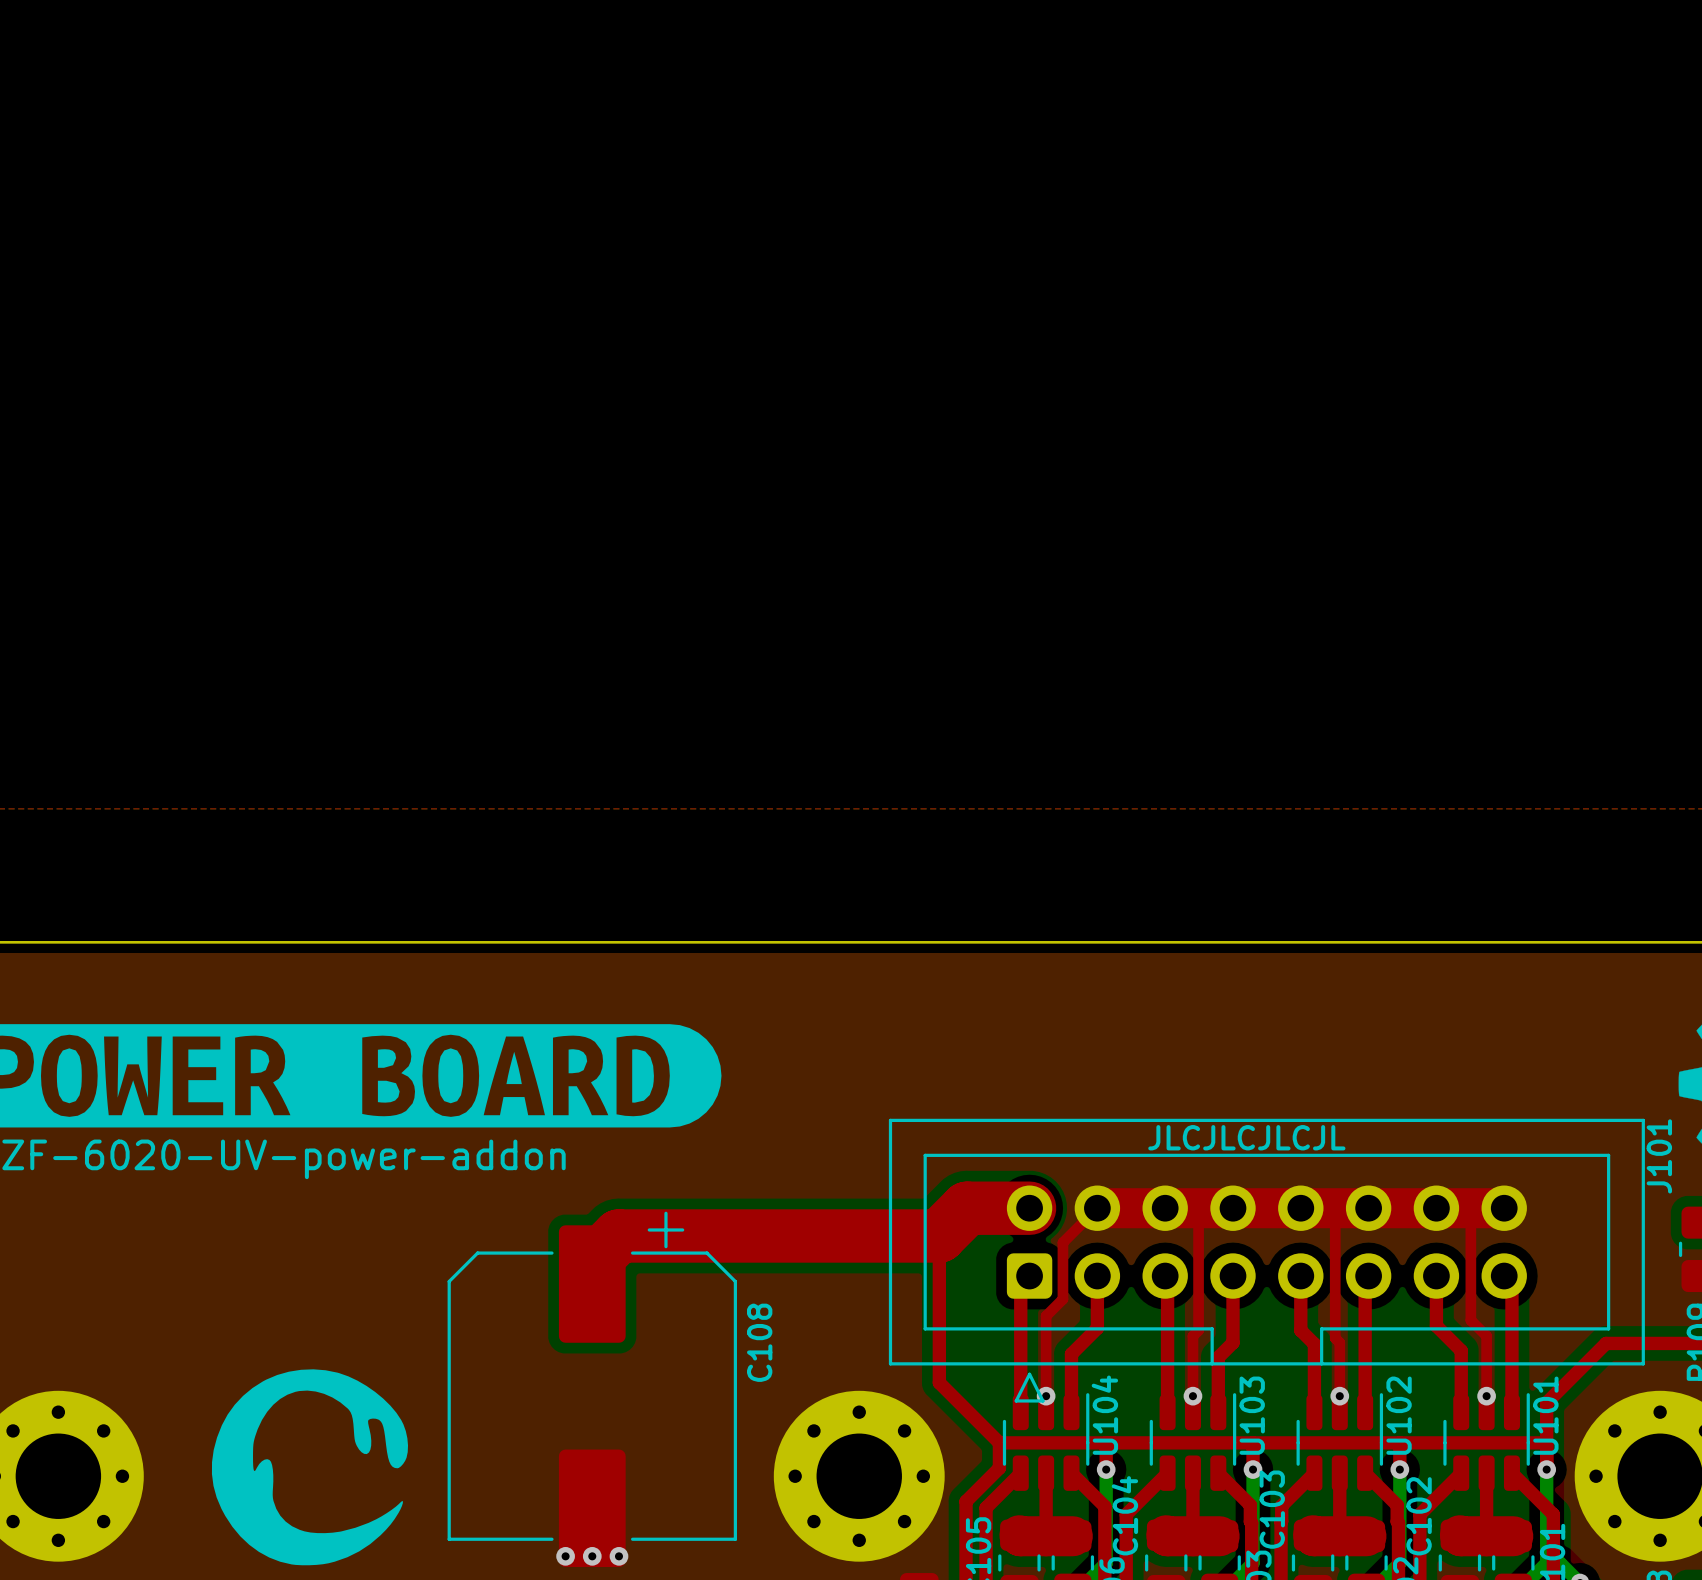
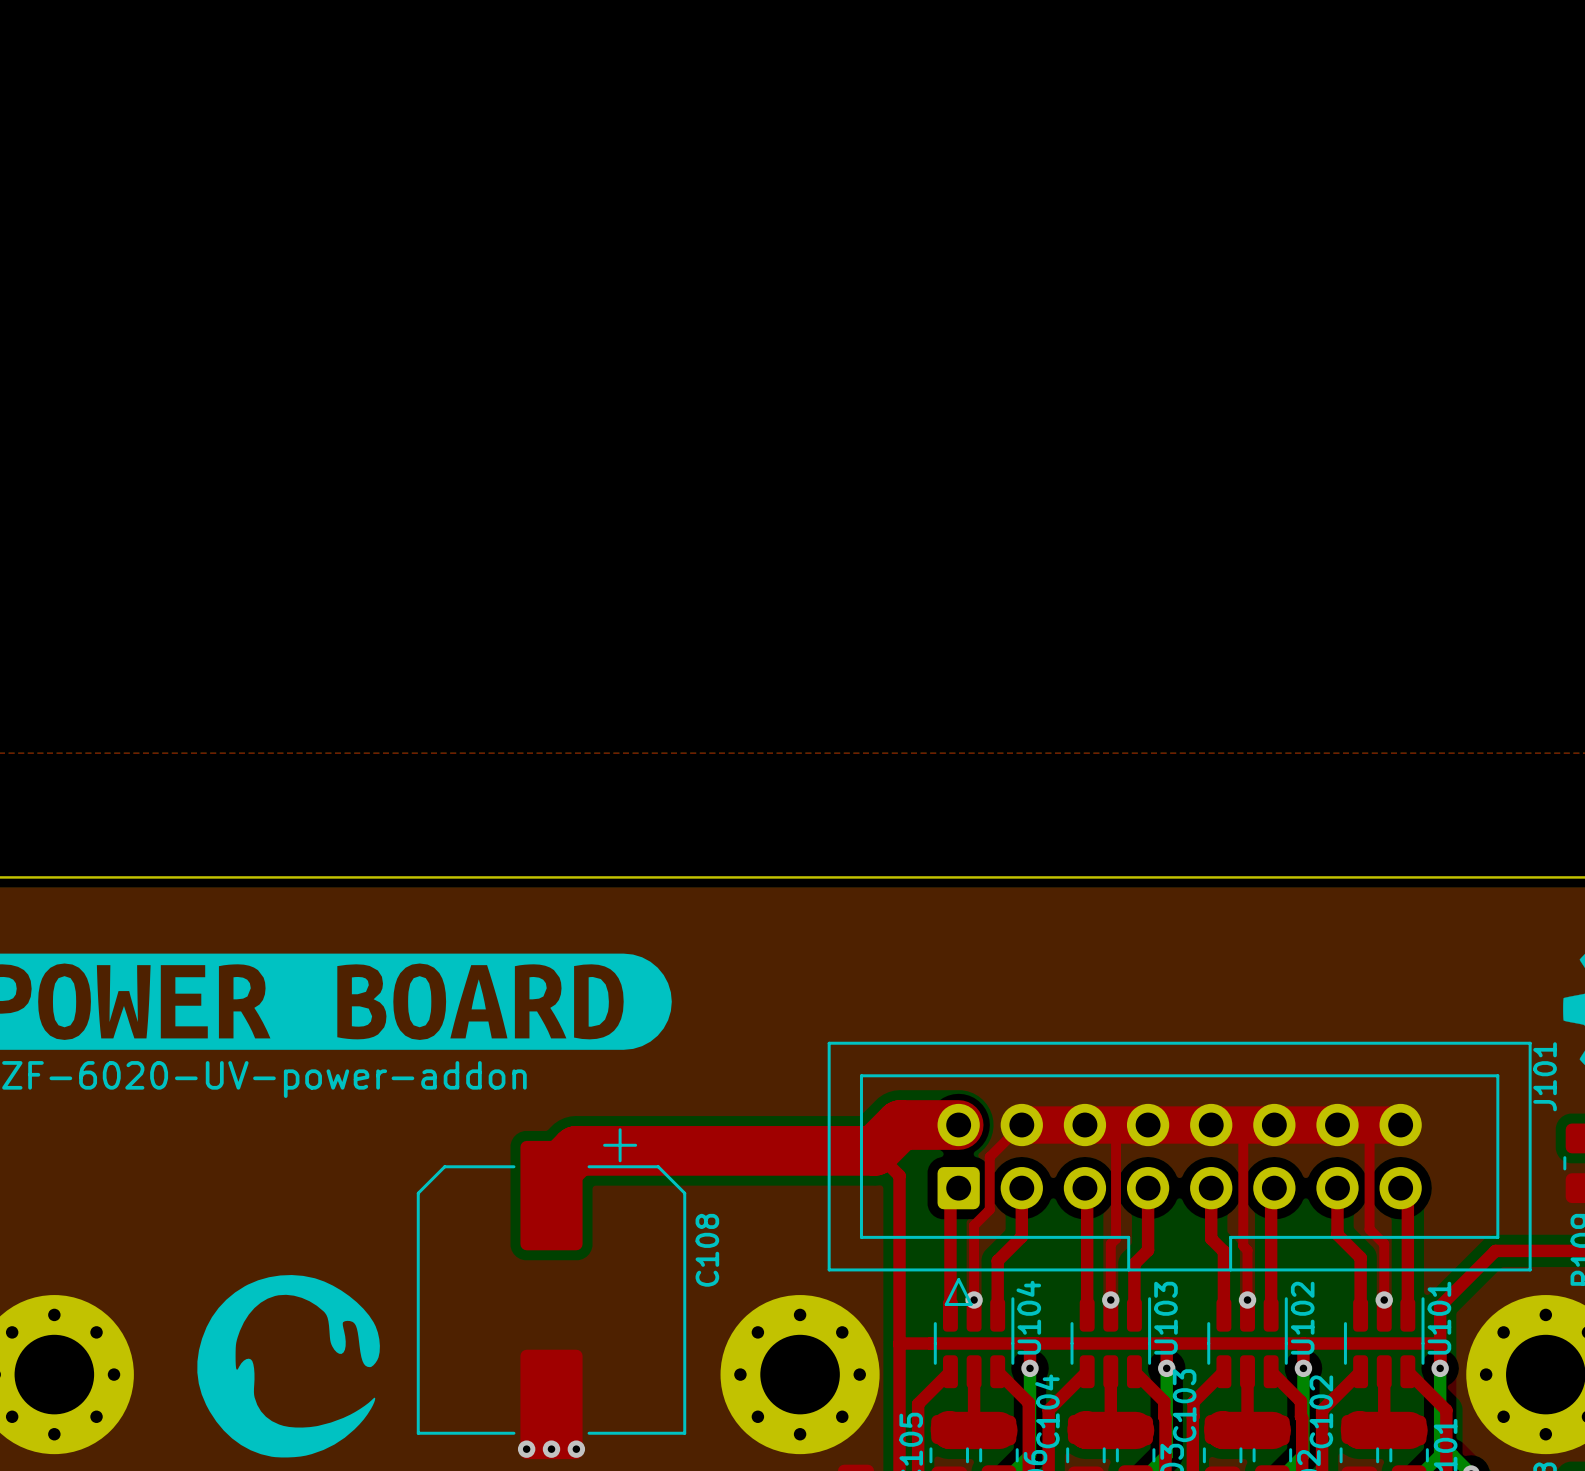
text: JLCJLCJLCJL (1246, 1137) -> none
top track: (939, 1235) (939, 1382) (999, 1442) (999, 1468) (966, 1501) -> (874, 1150) (899, 1175) (899, 1398)
top track: none -> (899, 1343) (930, 1343)

